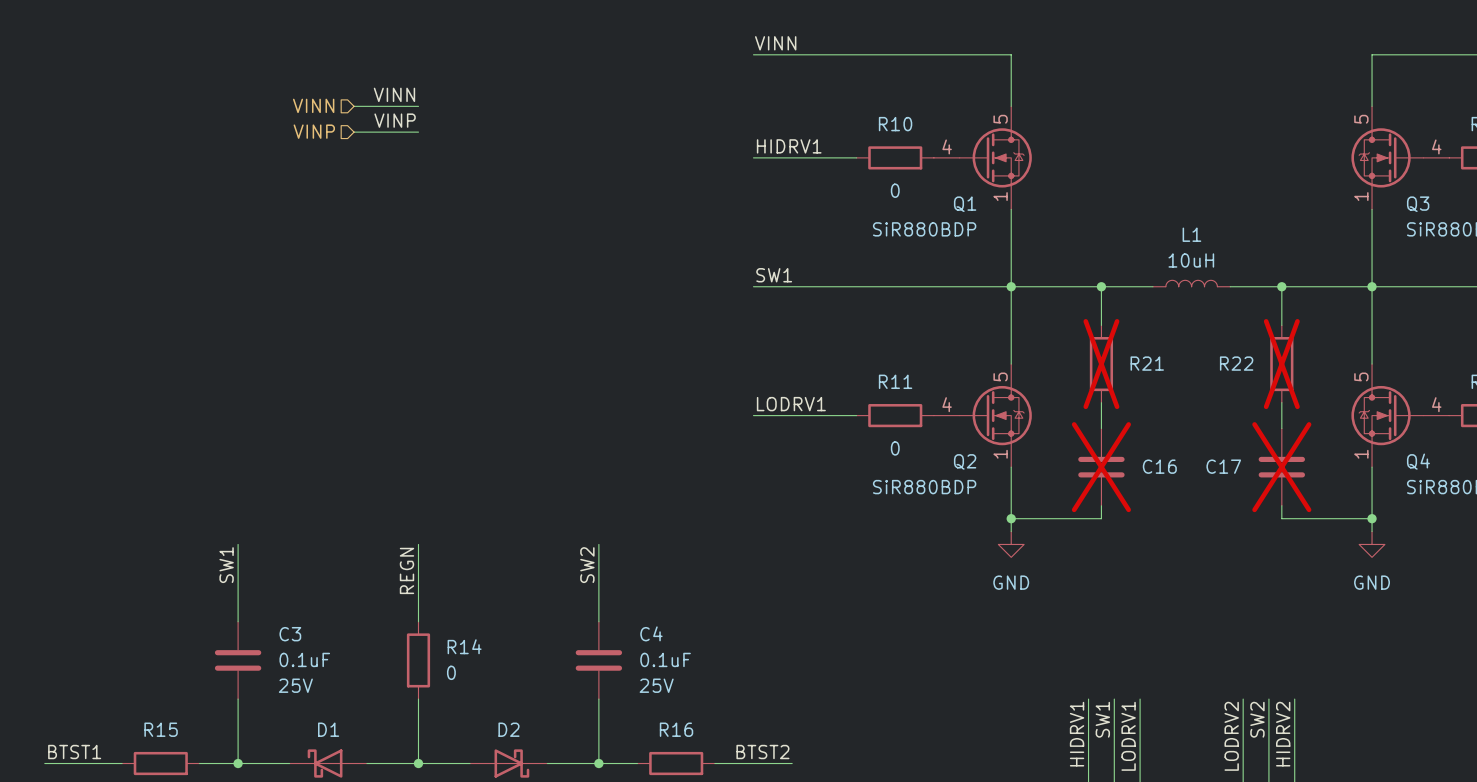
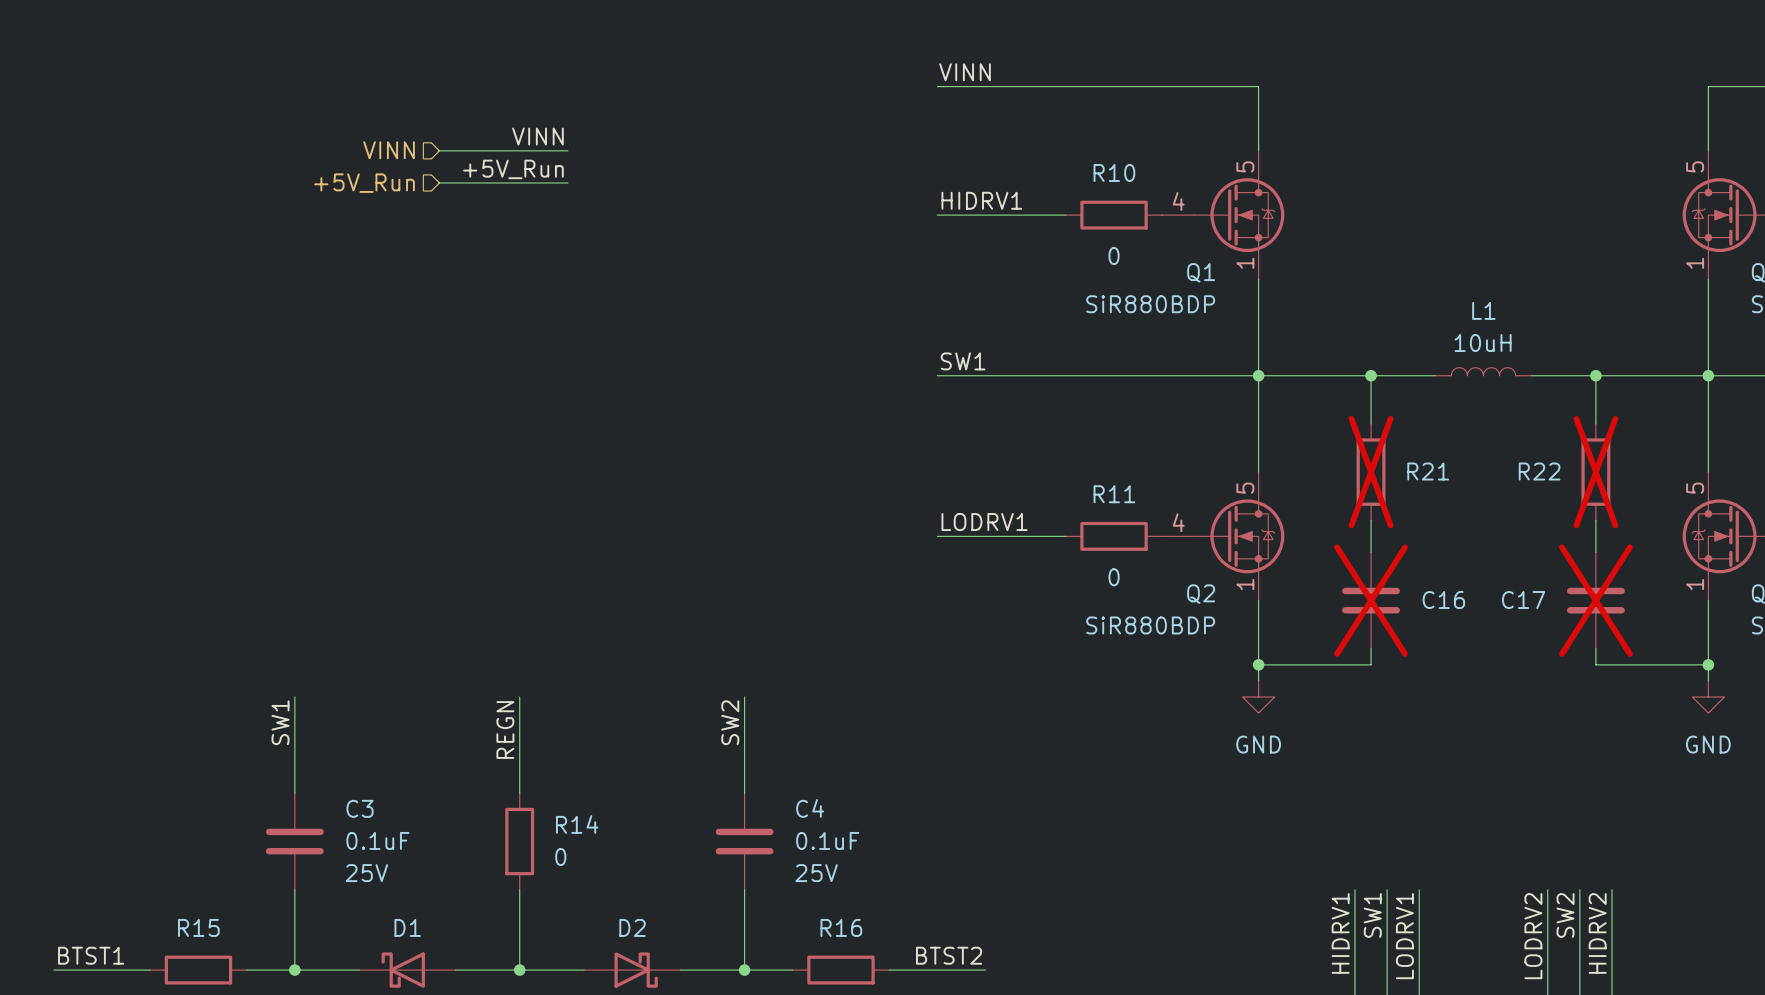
label position: VINN (394, 94) -> VINN (537, 136)
wire: none -> (519, 150) (567, 150)
label: VINP (395, 120) -> none
label: none -> +5V_Run (513, 169)
hierarchical label: VINP (314, 131) -> +5V_Run (364, 183)
wire: none -> (519, 182) (567, 182)

